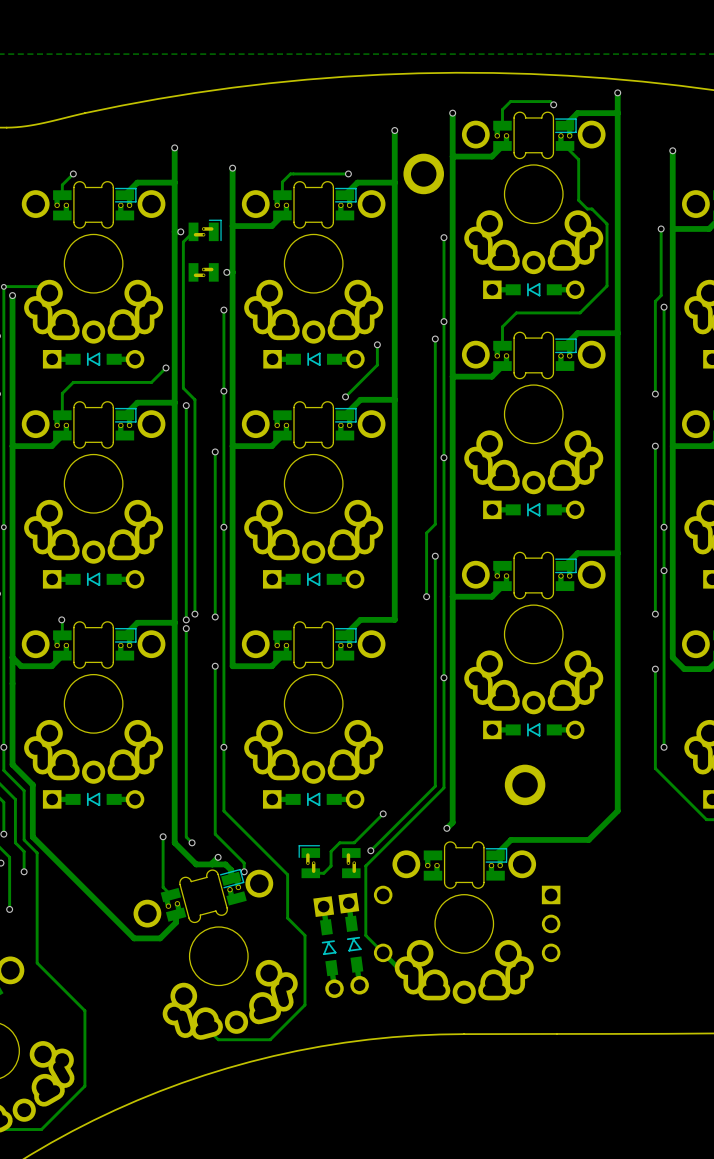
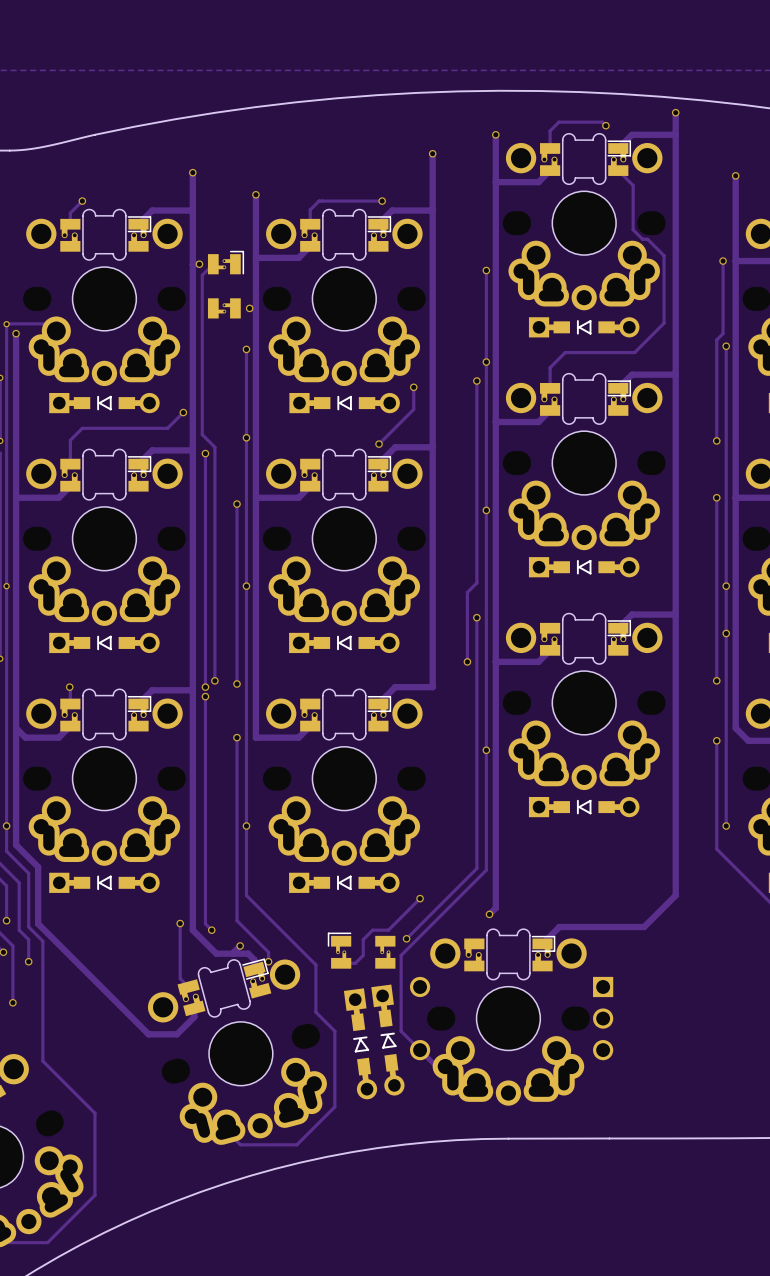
part: (423, 173) -> none
part: (525, 784) -> none

